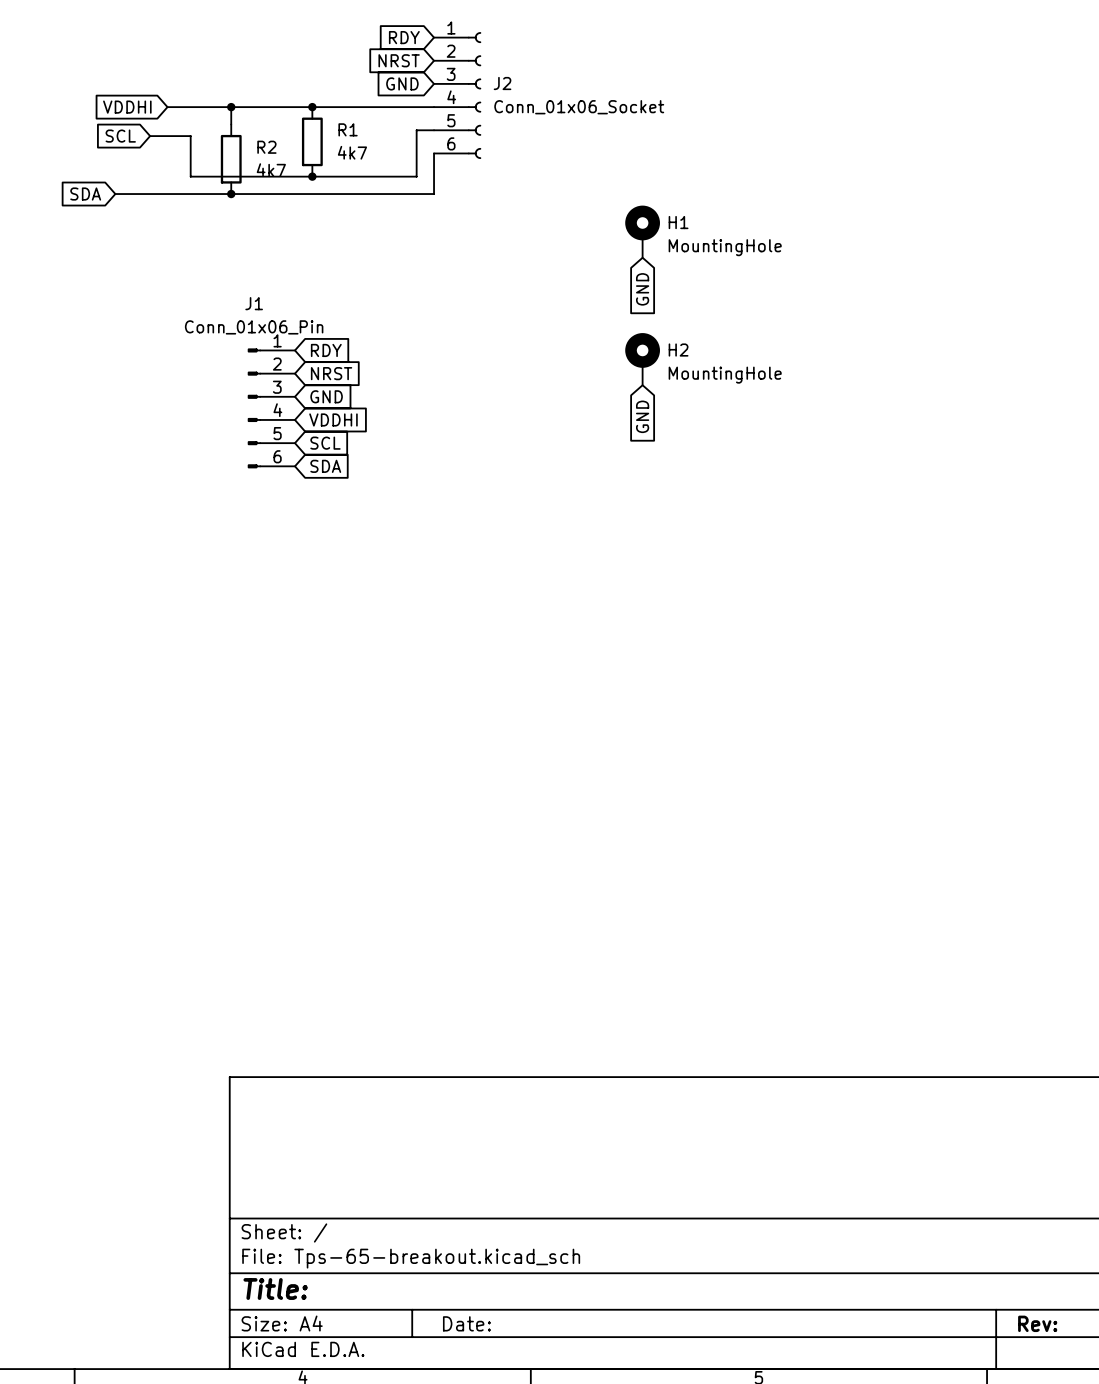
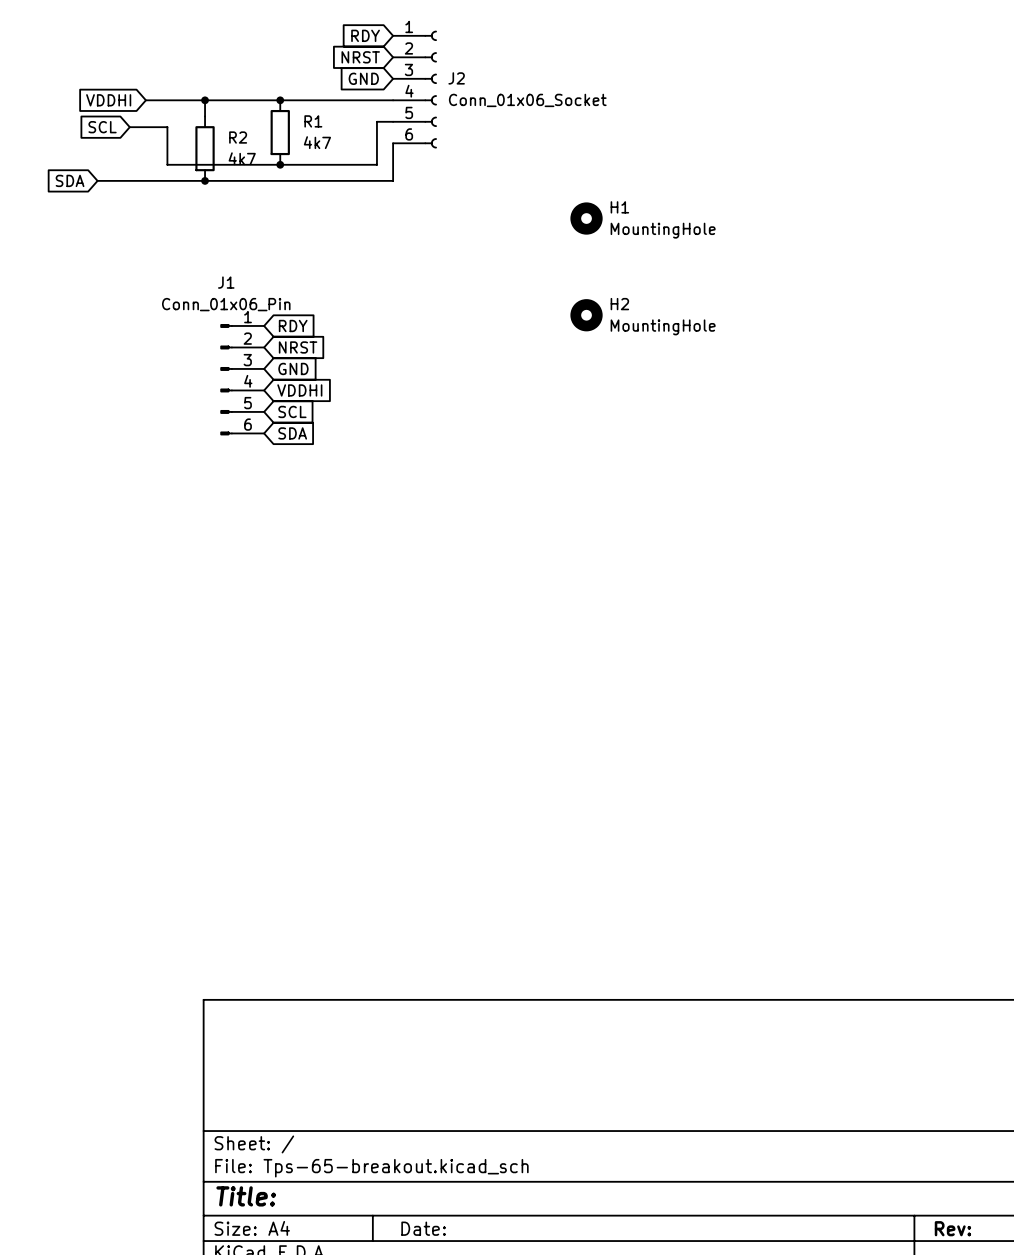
H1 symbol: [625, 205, 660, 258] -> [570, 202, 603, 235]
global label: GND (642, 289) -> none
H2 symbol: [625, 333, 660, 386] -> [570, 299, 603, 332]
global label: GND (642, 416) -> none

